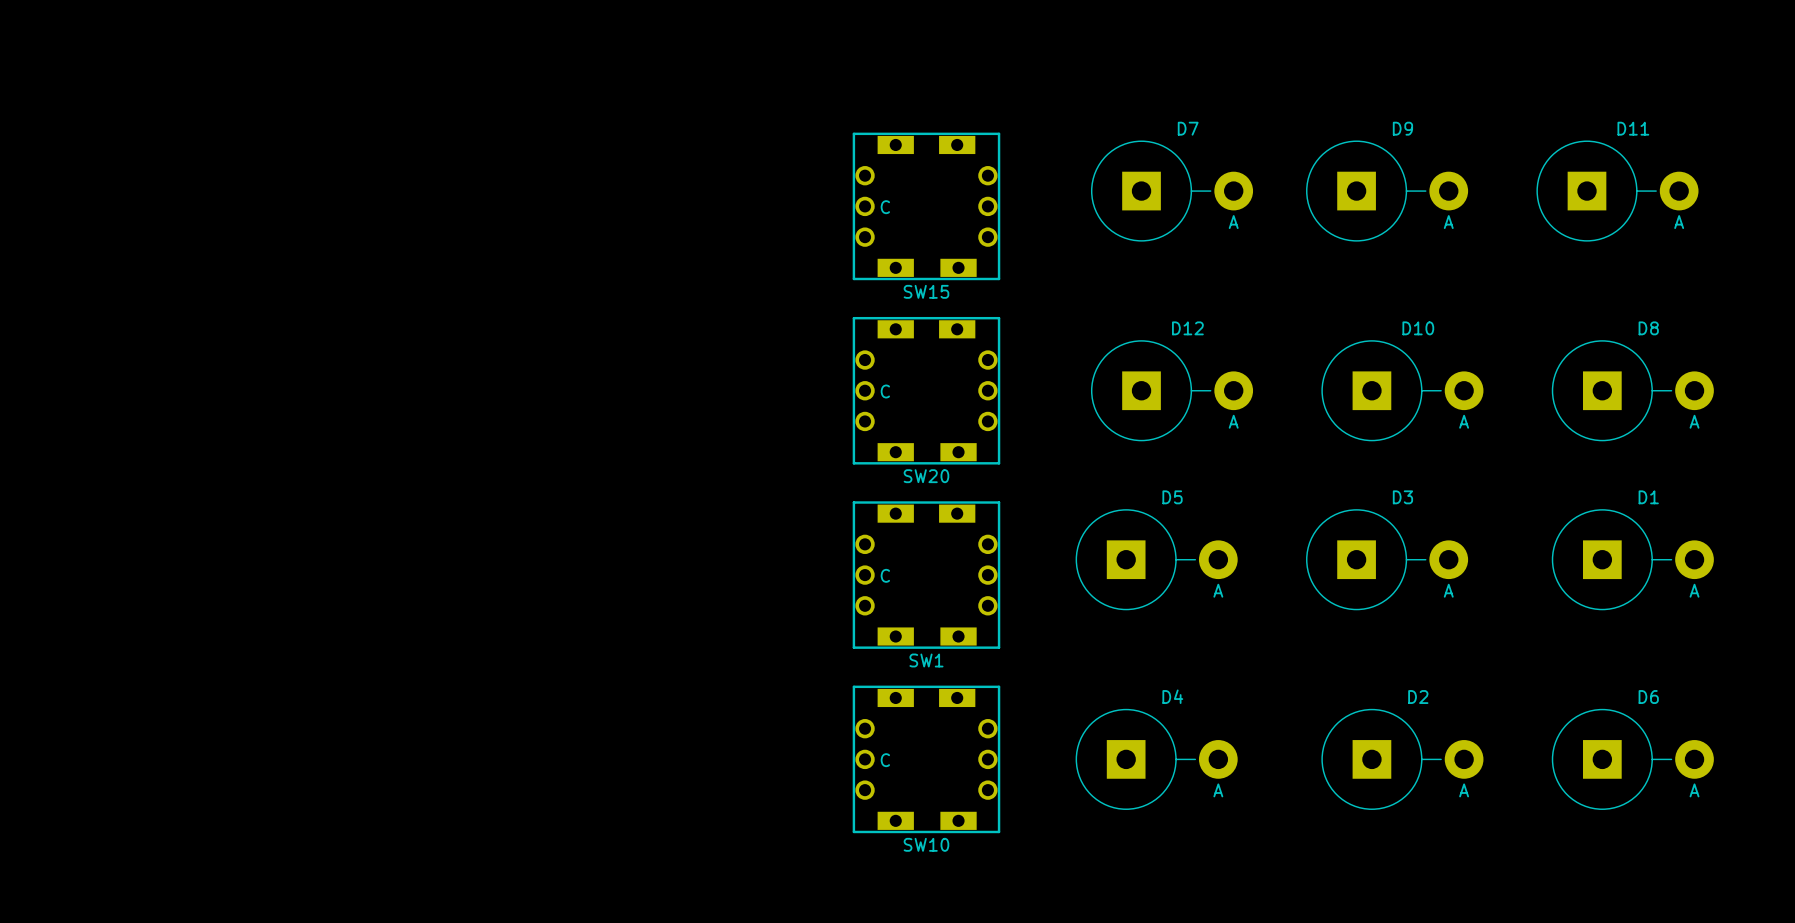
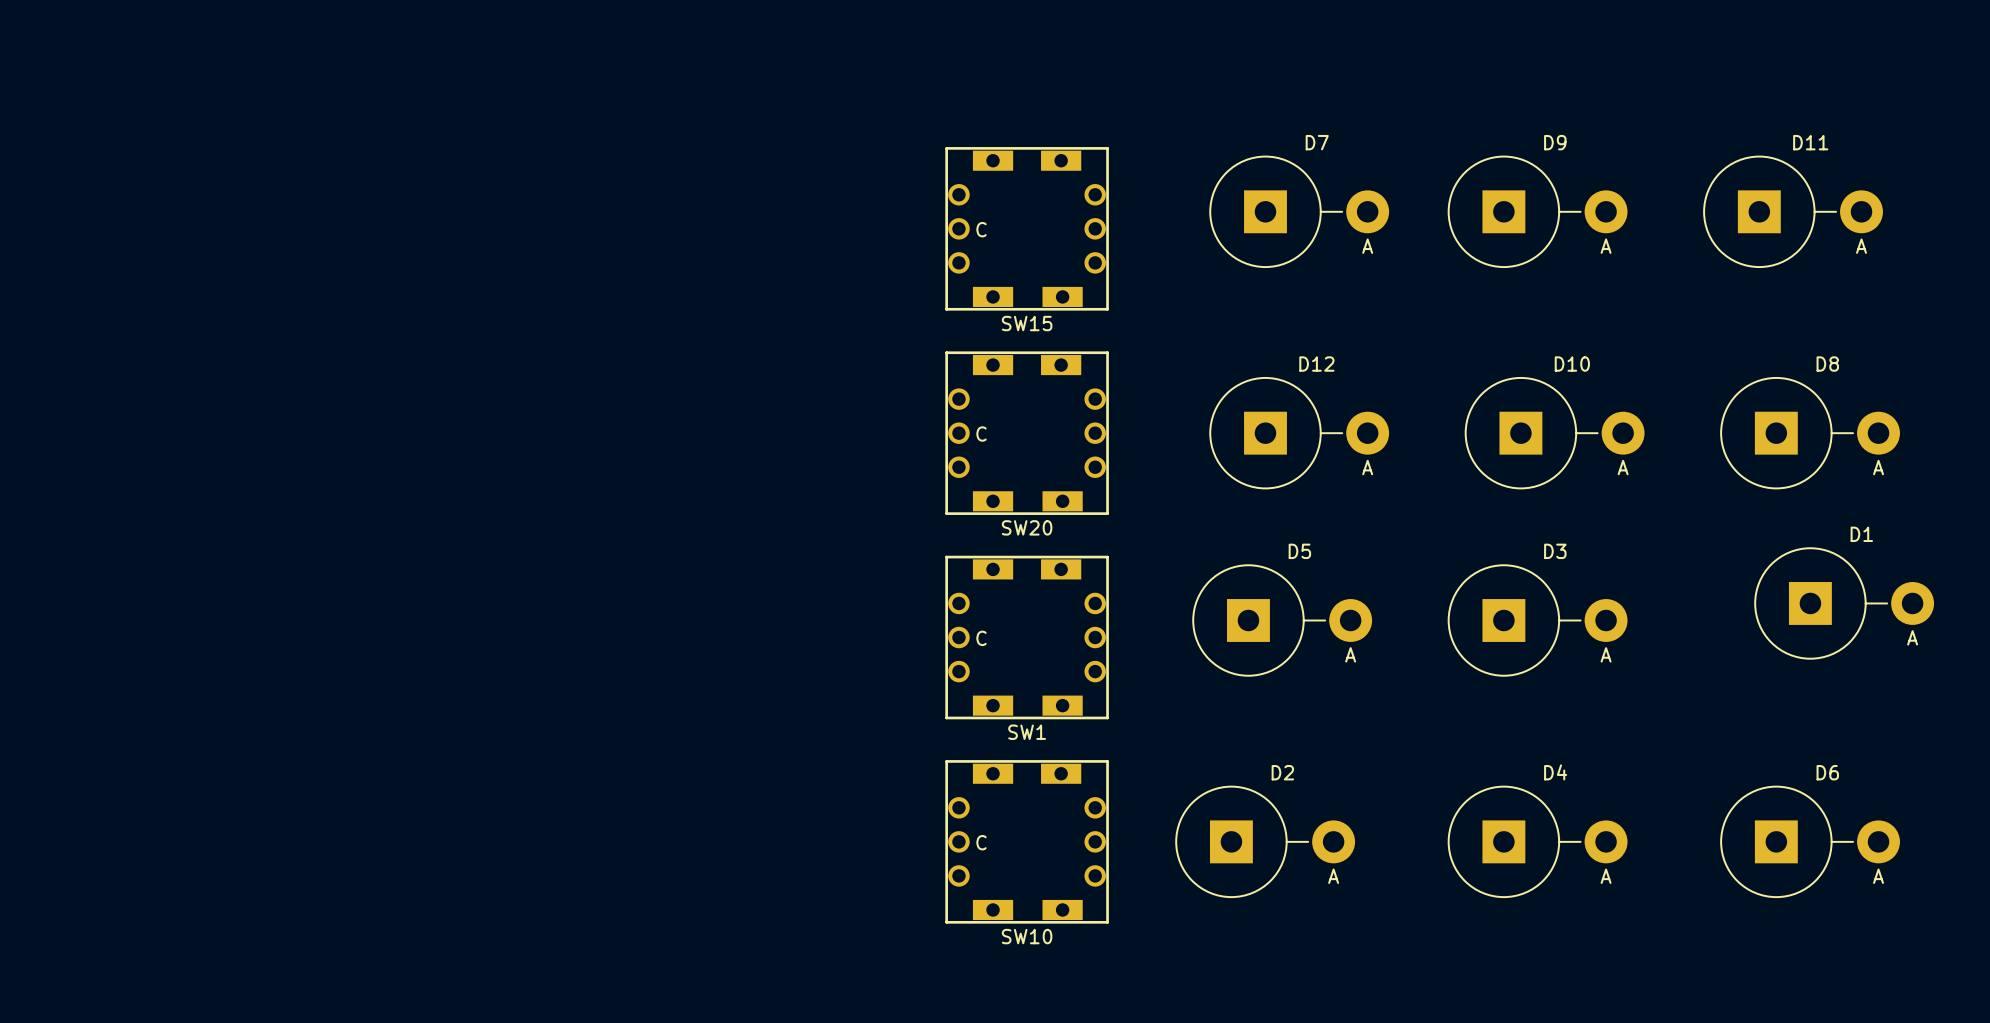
D1 position: (1632, 559) -> (1844, 603)
D4 position: (1156, 759) -> (1537, 841)
D2 position: (1402, 759) -> (1265, 841)

